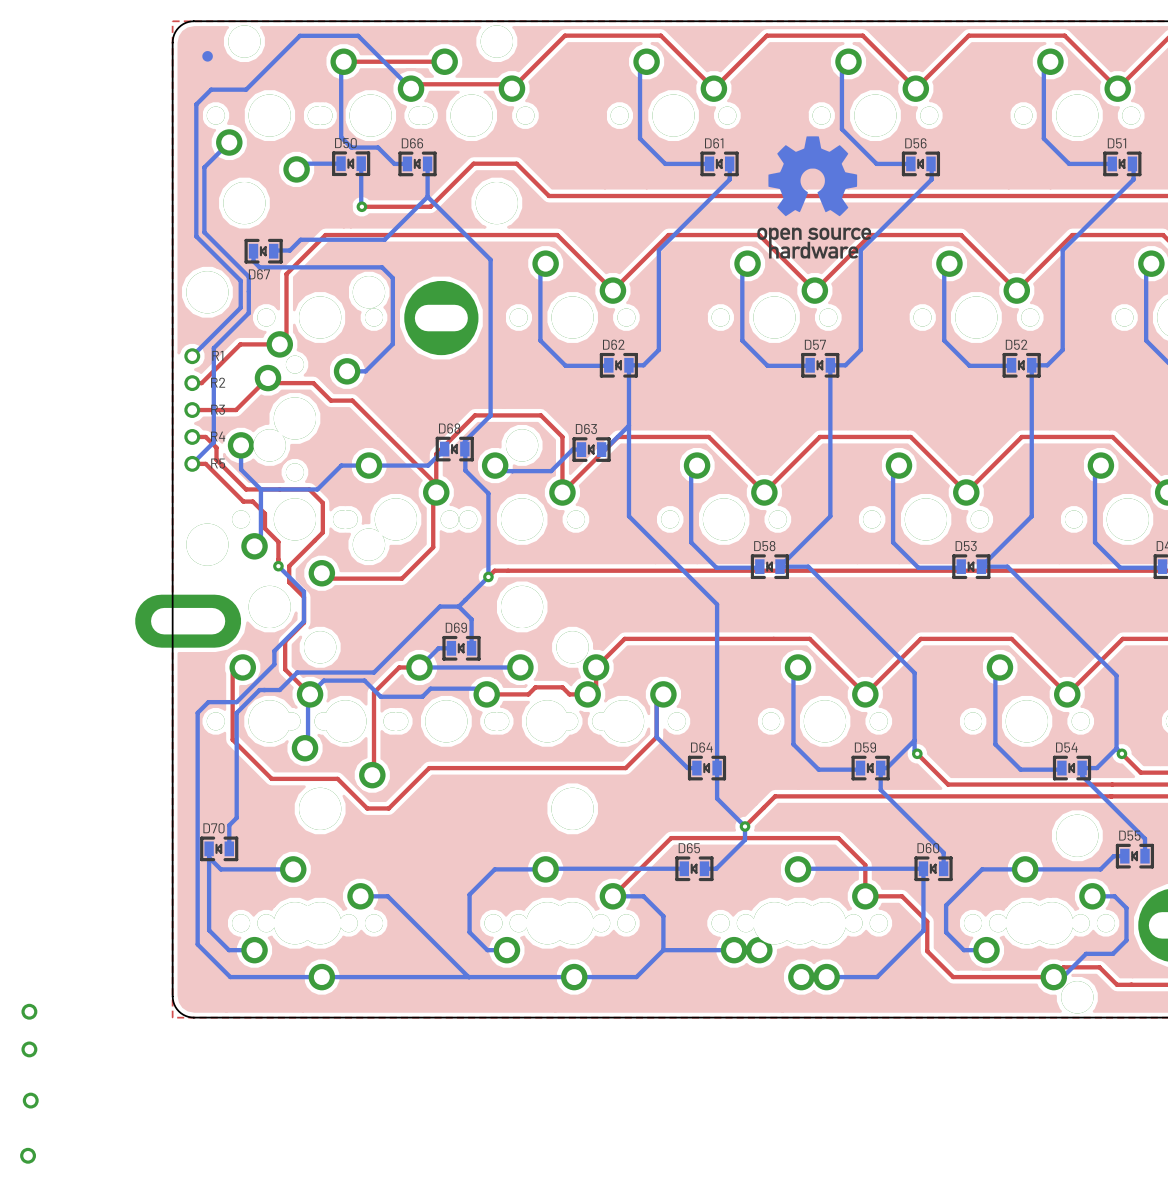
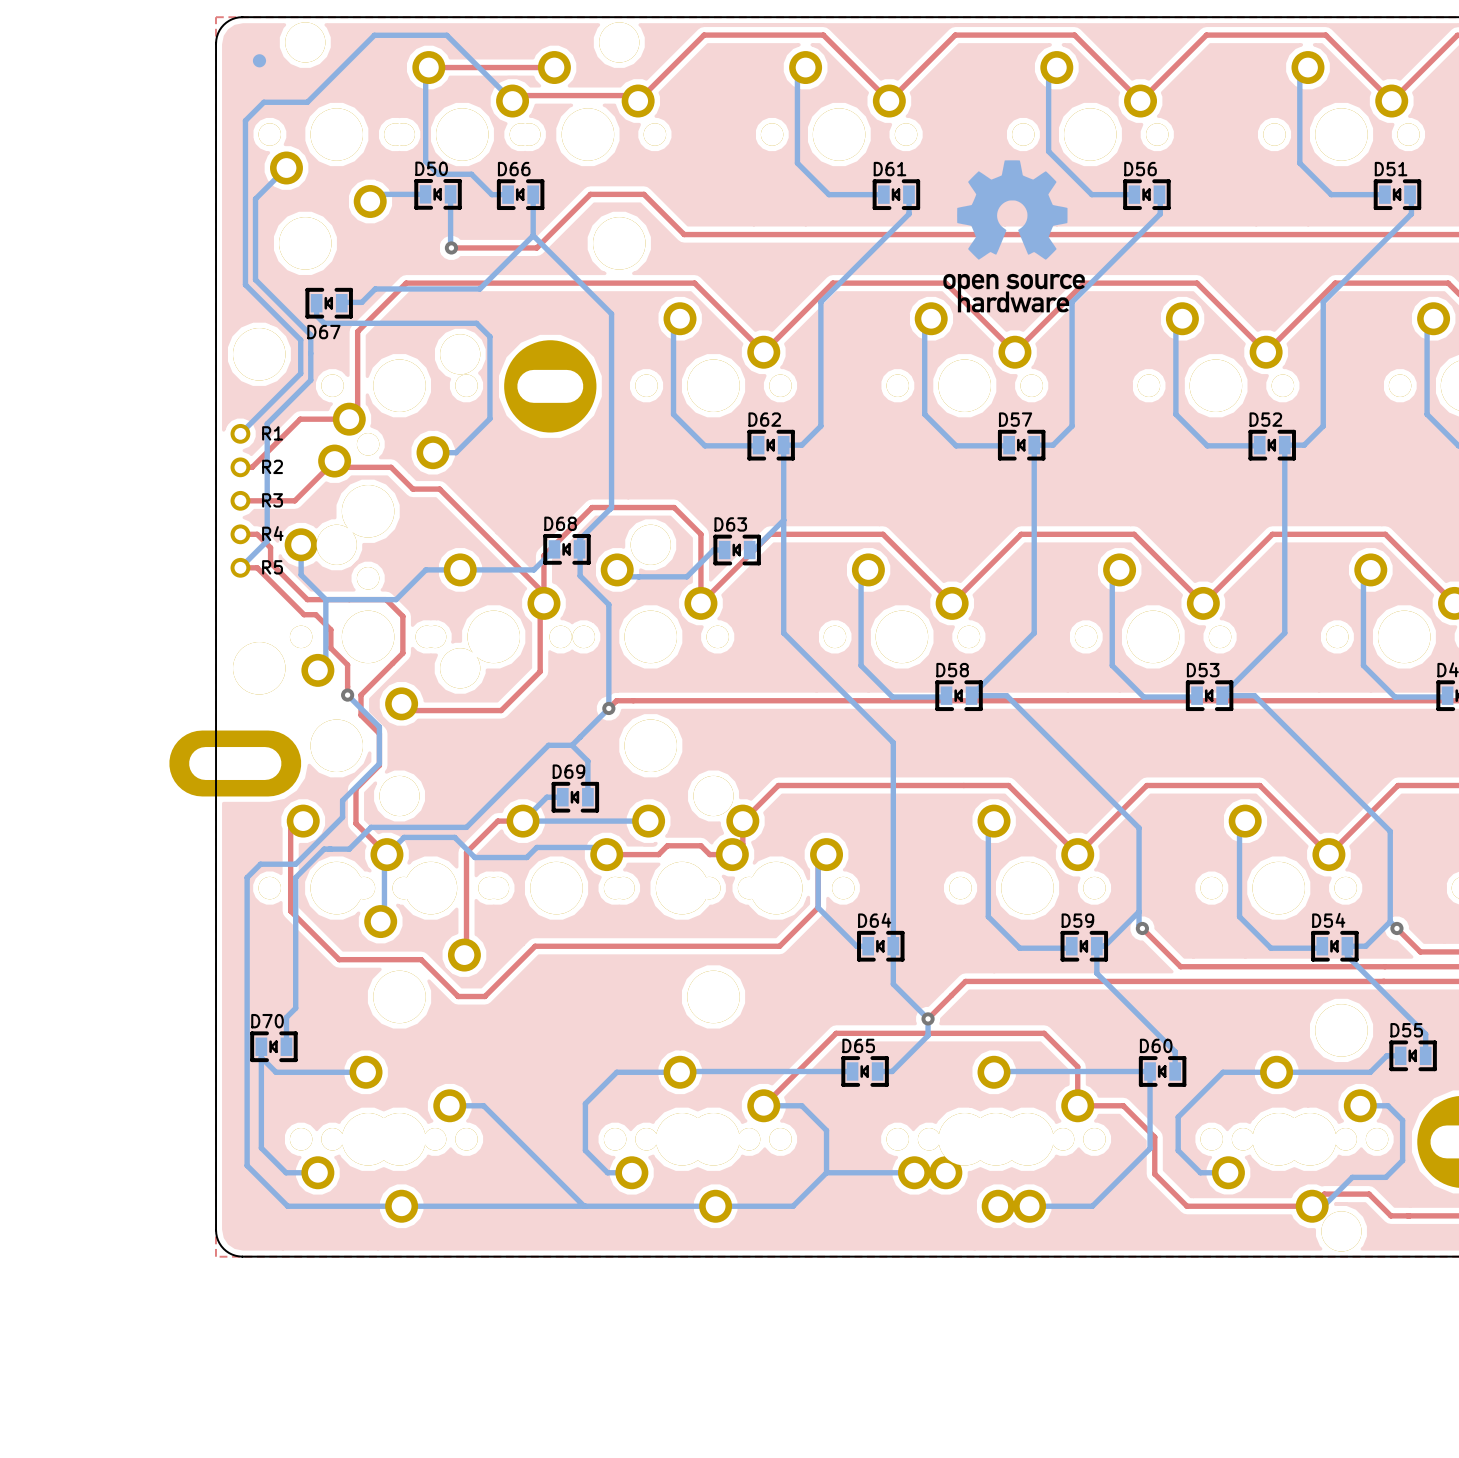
part: (29, 1011) -> none
part: (29, 1049) -> none
part: (30, 1100) -> none
part: (28, 1155) -> none

